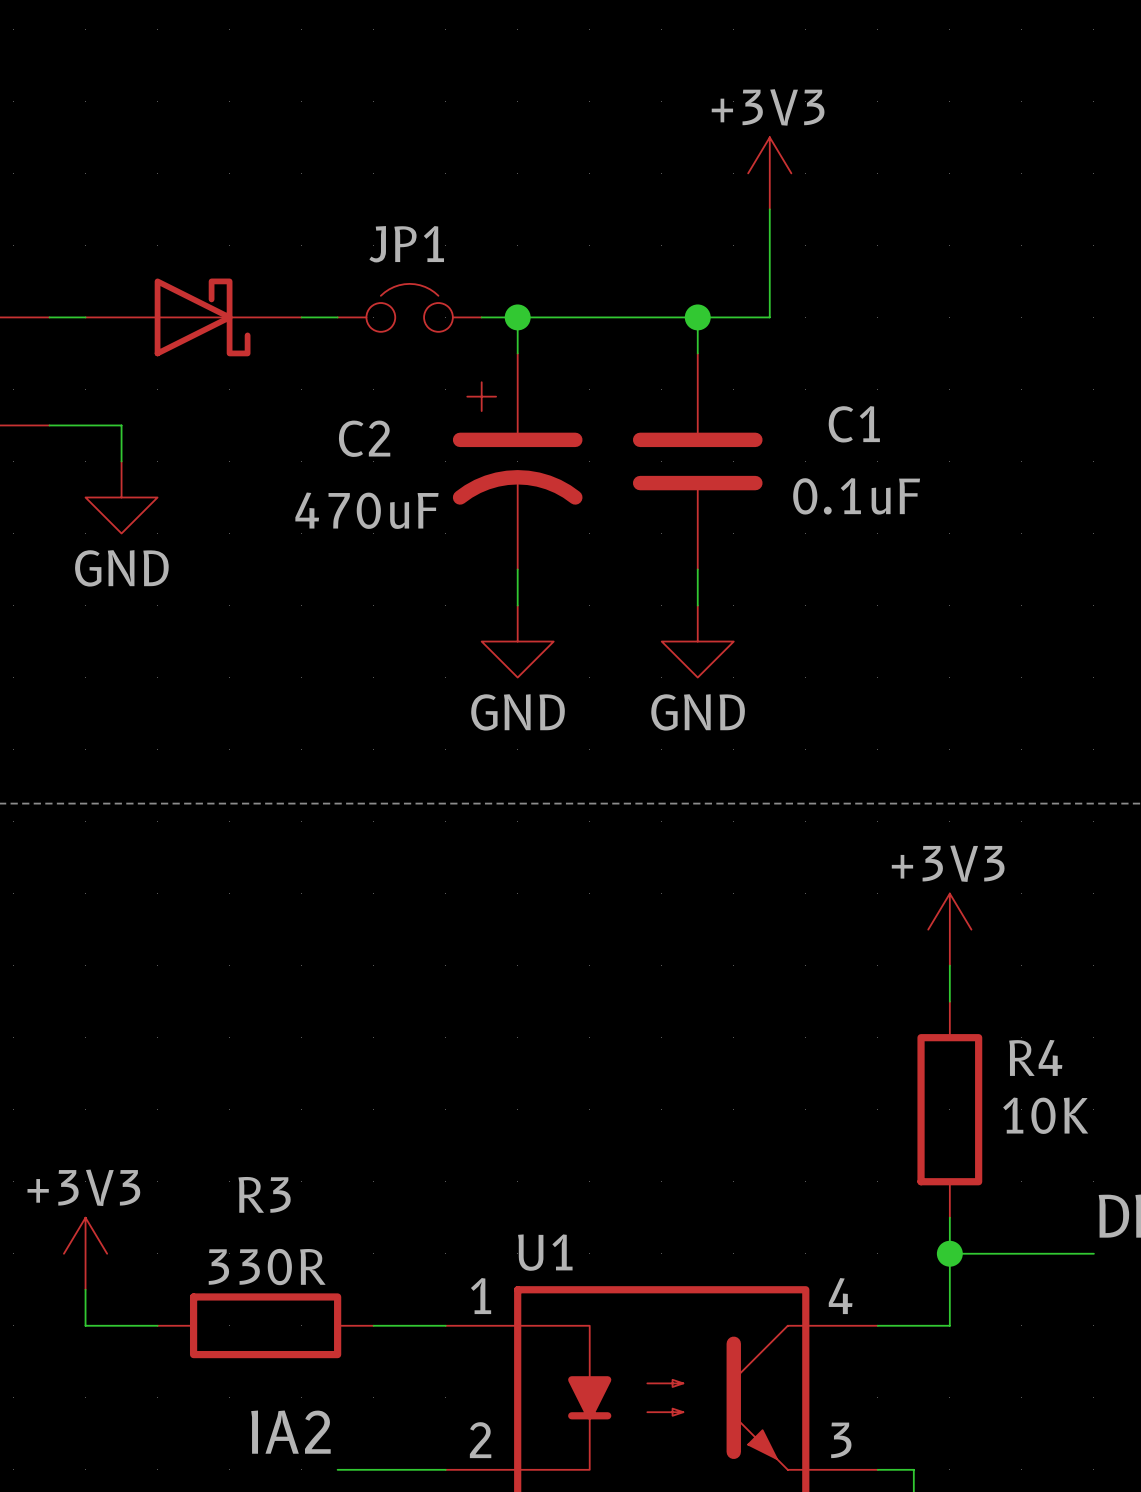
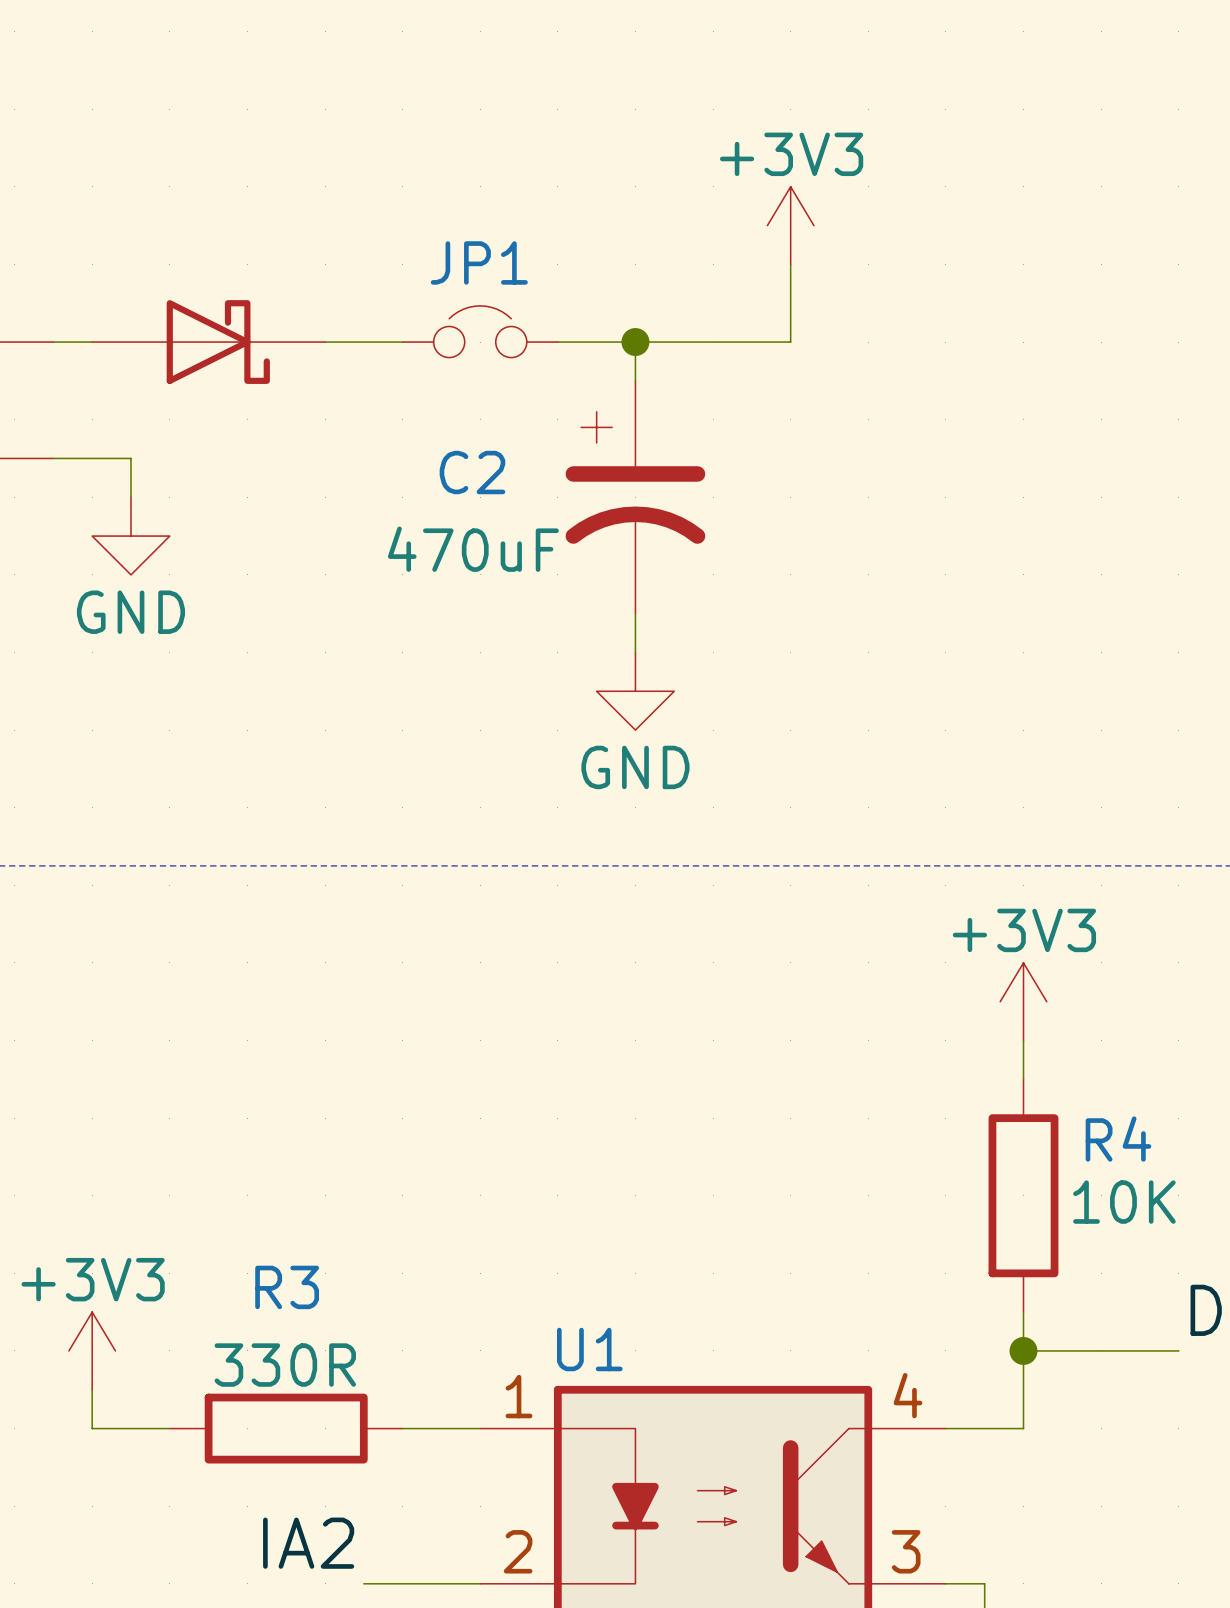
power symbol position: +3V3 (769, 173) -> +3V3 (790, 225)
wire: (769, 209) (769, 317) (733, 317) -> (790, 264) (790, 342)
JP1 position: (409, 307) -> (480, 331)
wire: (481, 317) (517, 317) (517, 353) -> none
junction: (517, 317) -> none
junction: none -> (635, 342)
wire: (697, 317) (697, 353) -> (635, 342) (635, 380)
junction: (697, 317) -> none
C2 position: (517, 461) -> (635, 497)
C1: 0.1uF (697, 461) -> none
wire: (517, 569) (517, 605) -> none
wire: (697, 569) (697, 605) -> (635, 613) (635, 652)
power symbol: GND (517, 641) -> none
power symbol: none -> GND (635, 691)
power symbol: GND (697, 641) -> none

